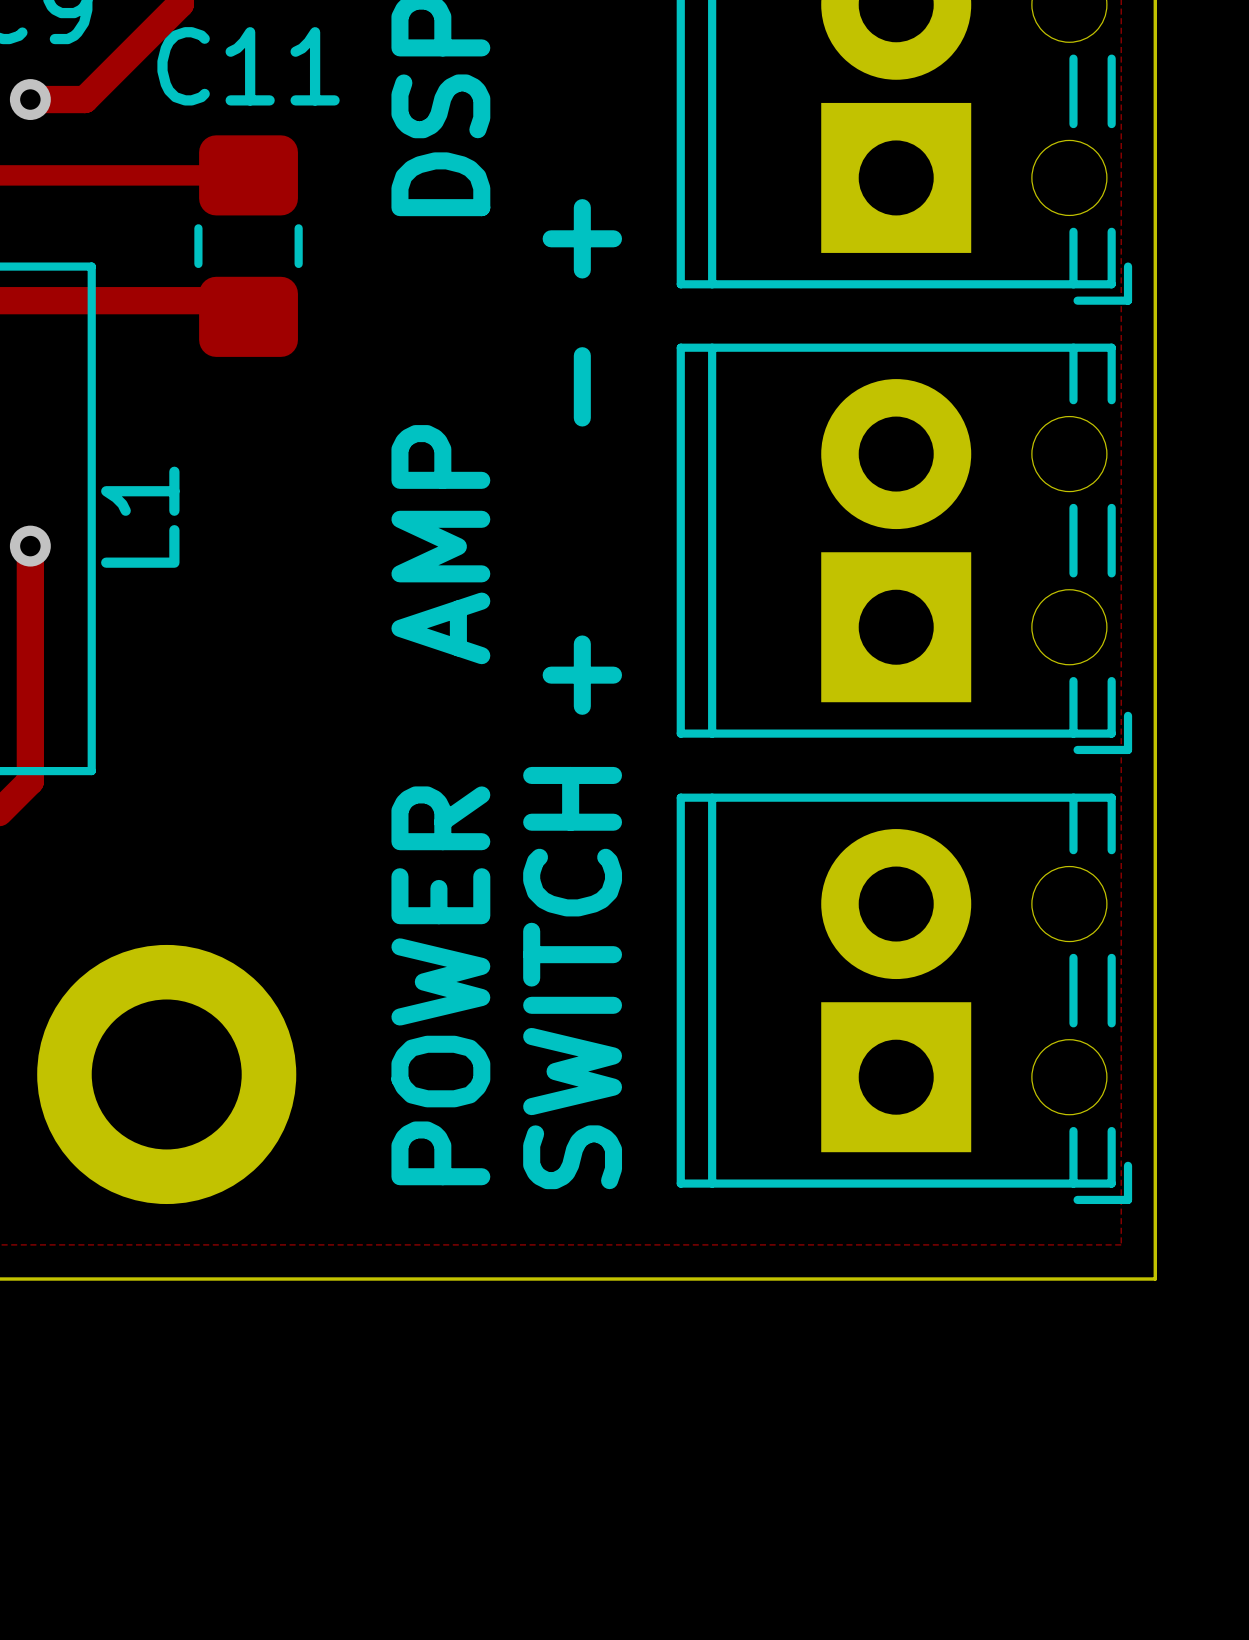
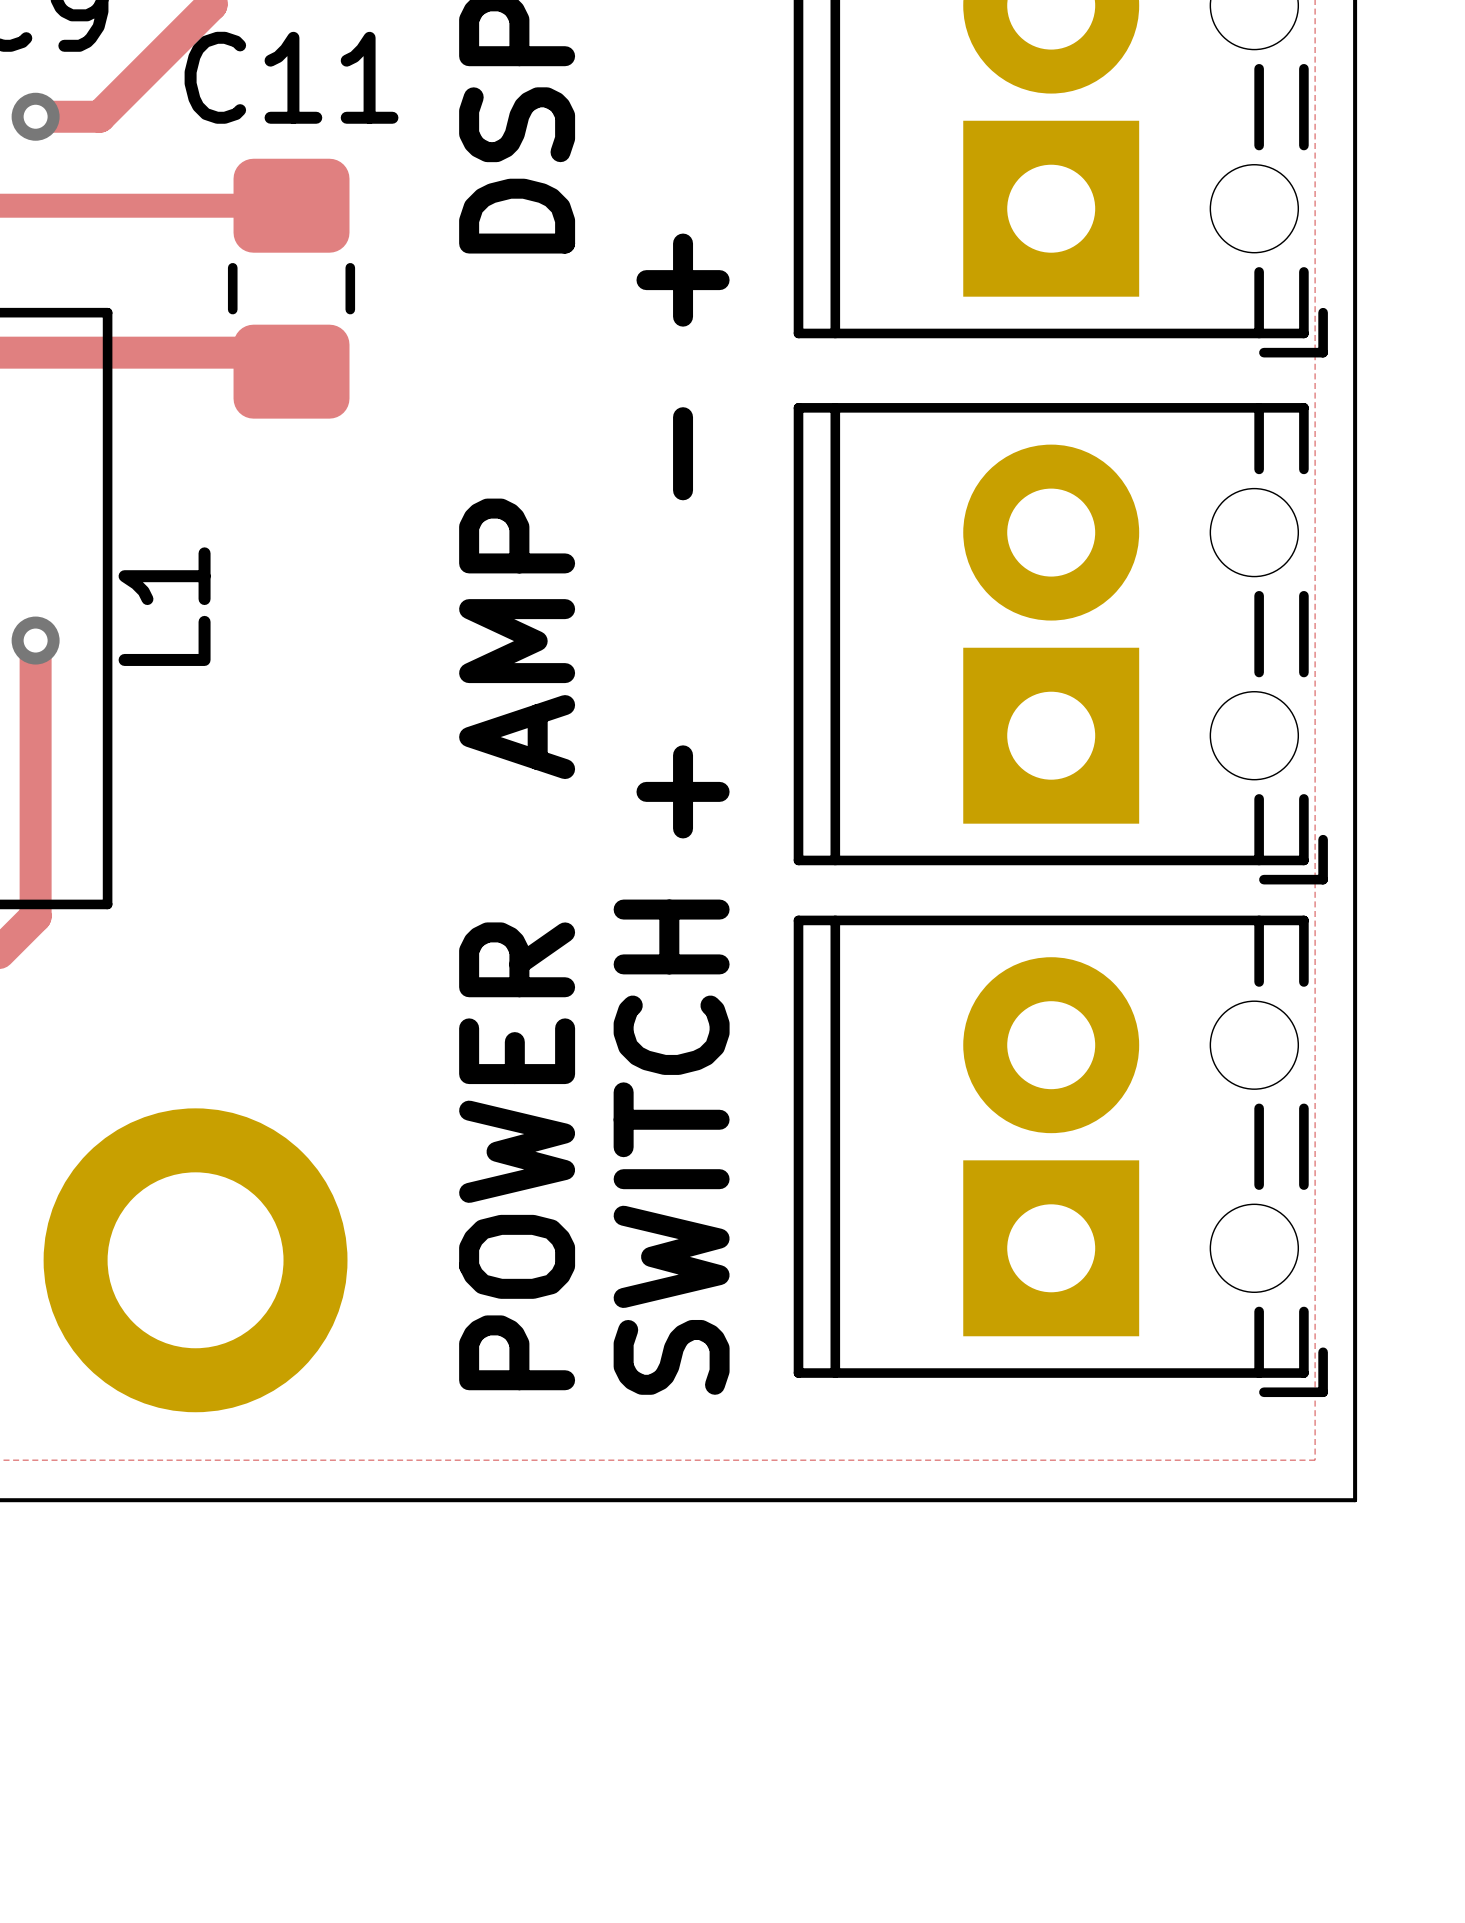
part position: (904, 998) -> (1060, 1156)

